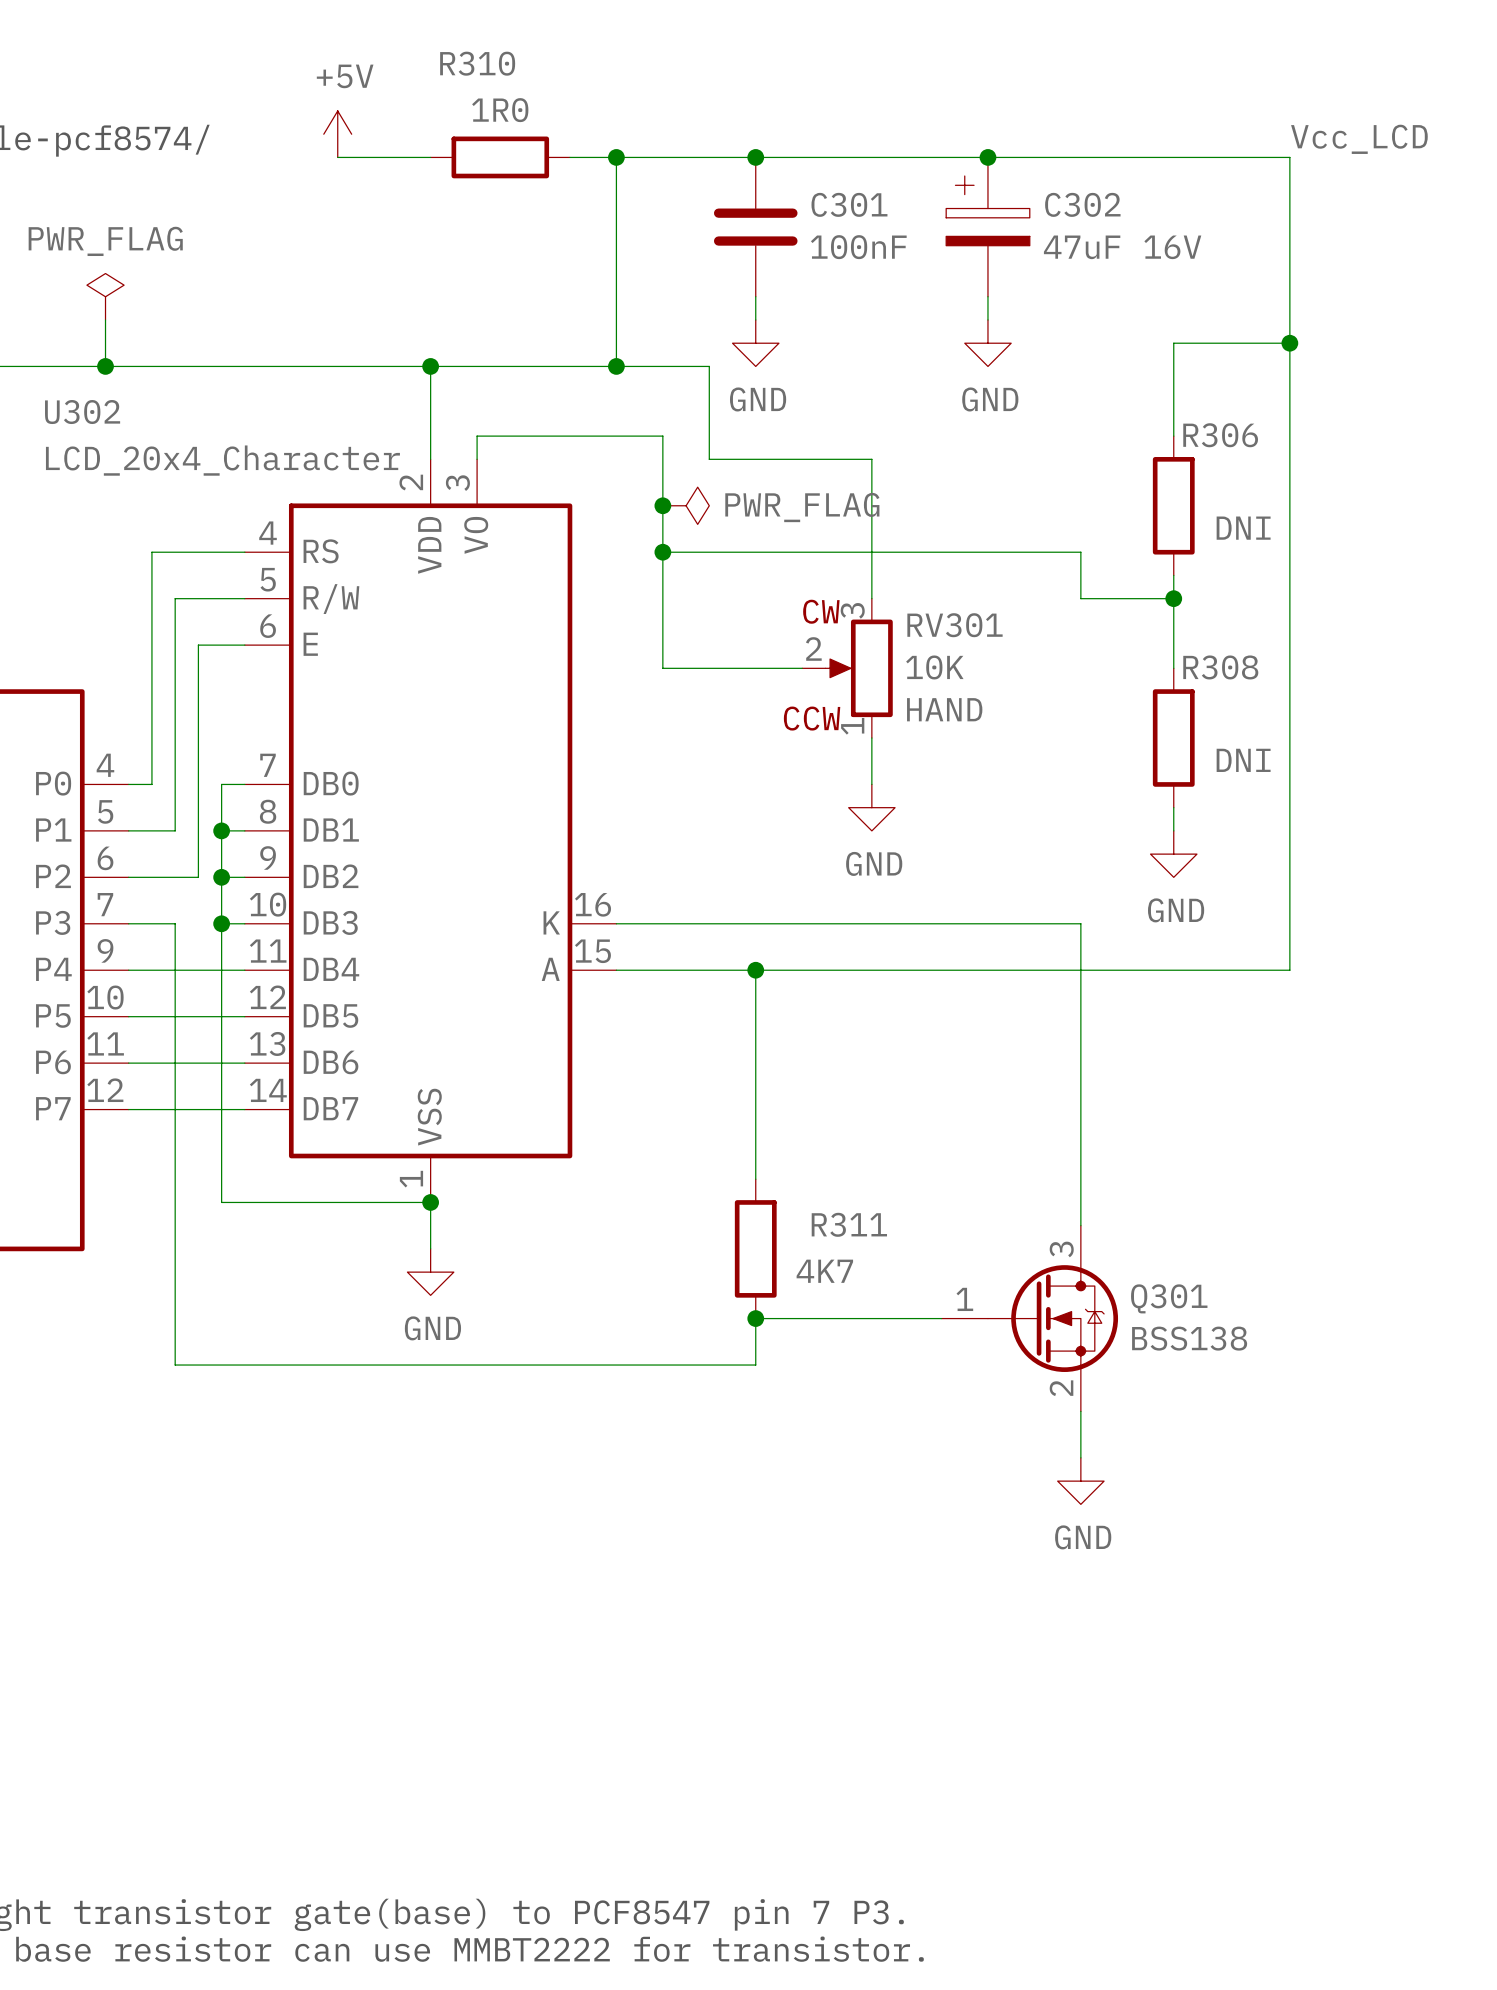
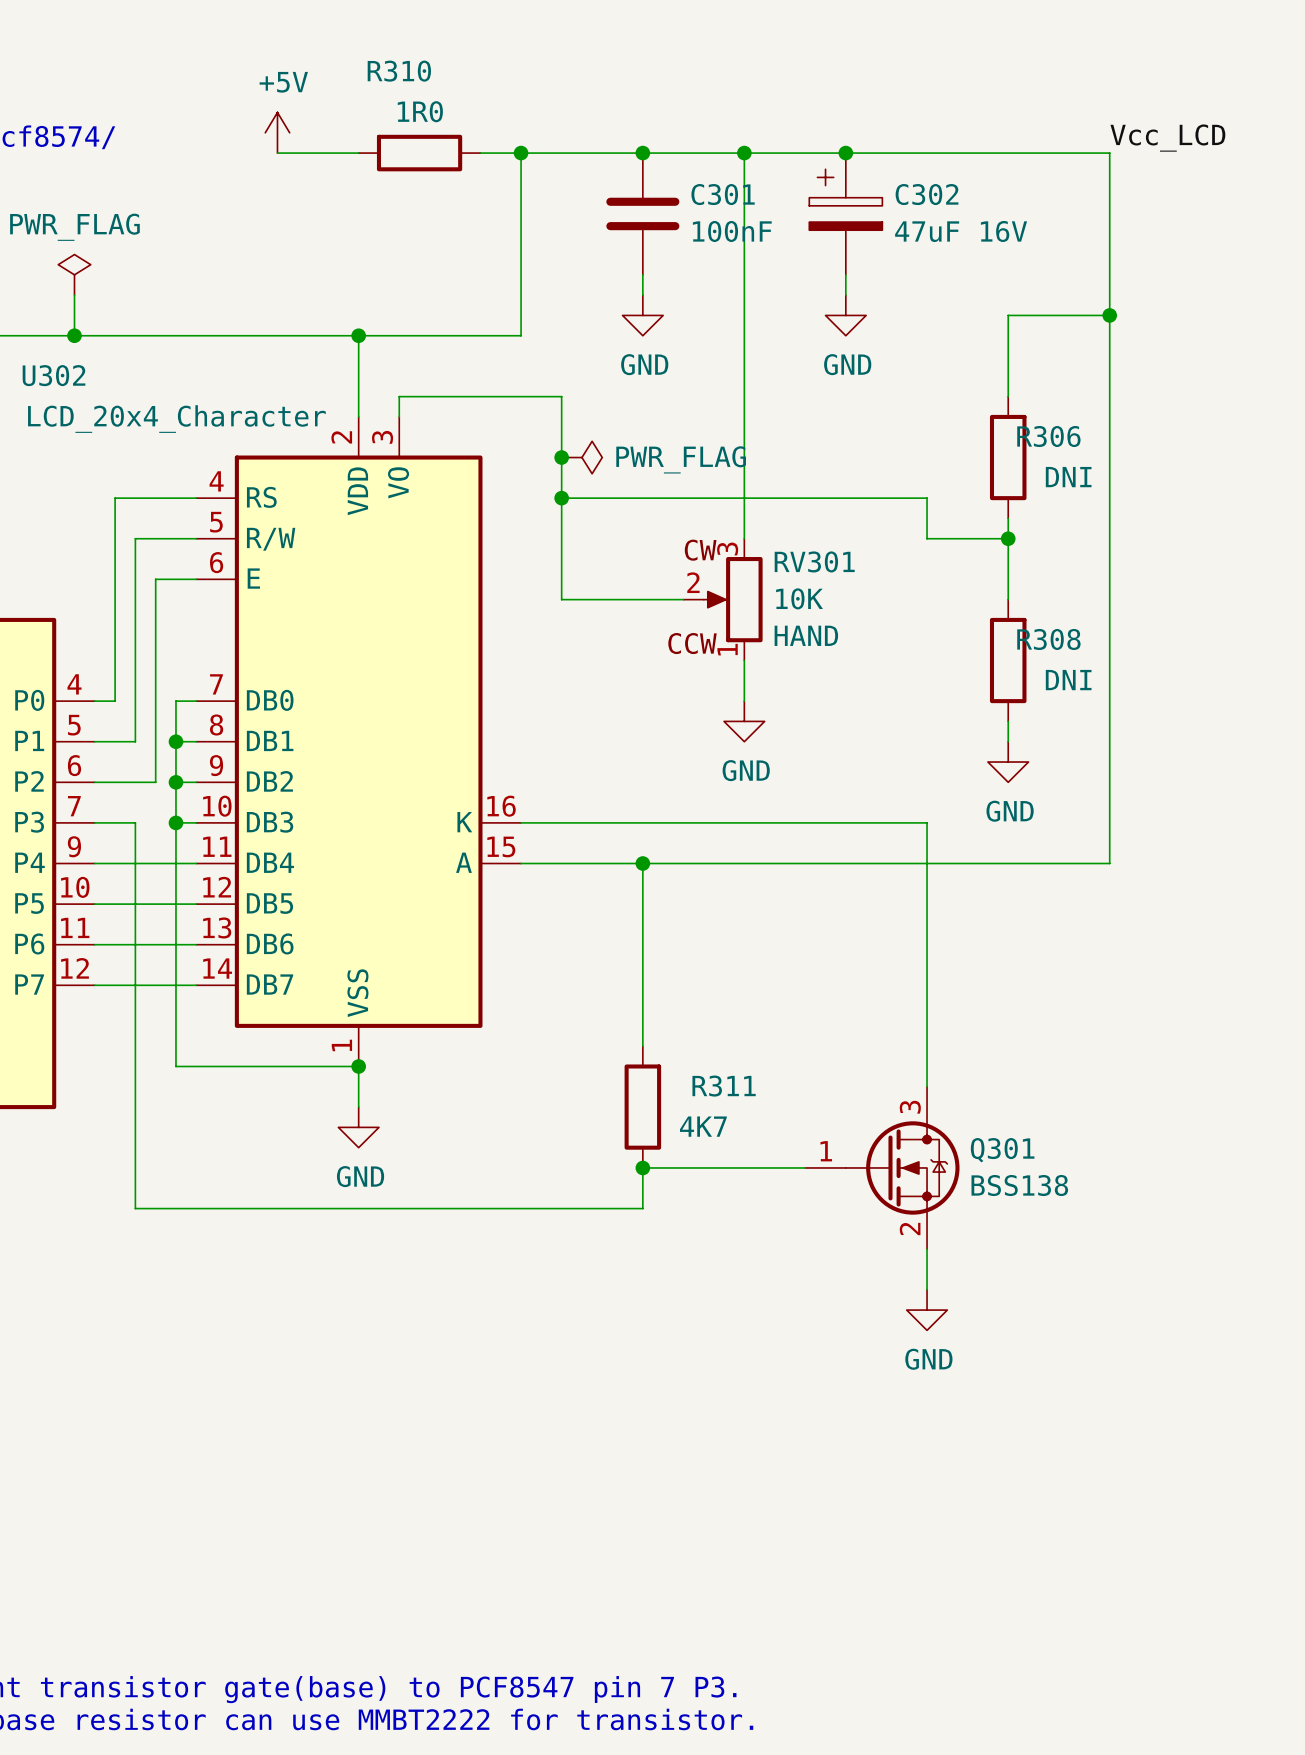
junction: none -> (744, 153)
wire: (616, 366) (709, 366) (709, 459) (871, 459) -> (744, 153) (744, 416)
junction: (616, 366) -> none
R306 name position: R306 (1220, 435) -> R306 (1048, 436)
R308 name position: R308 (1220, 667) -> R308 (1048, 639)

